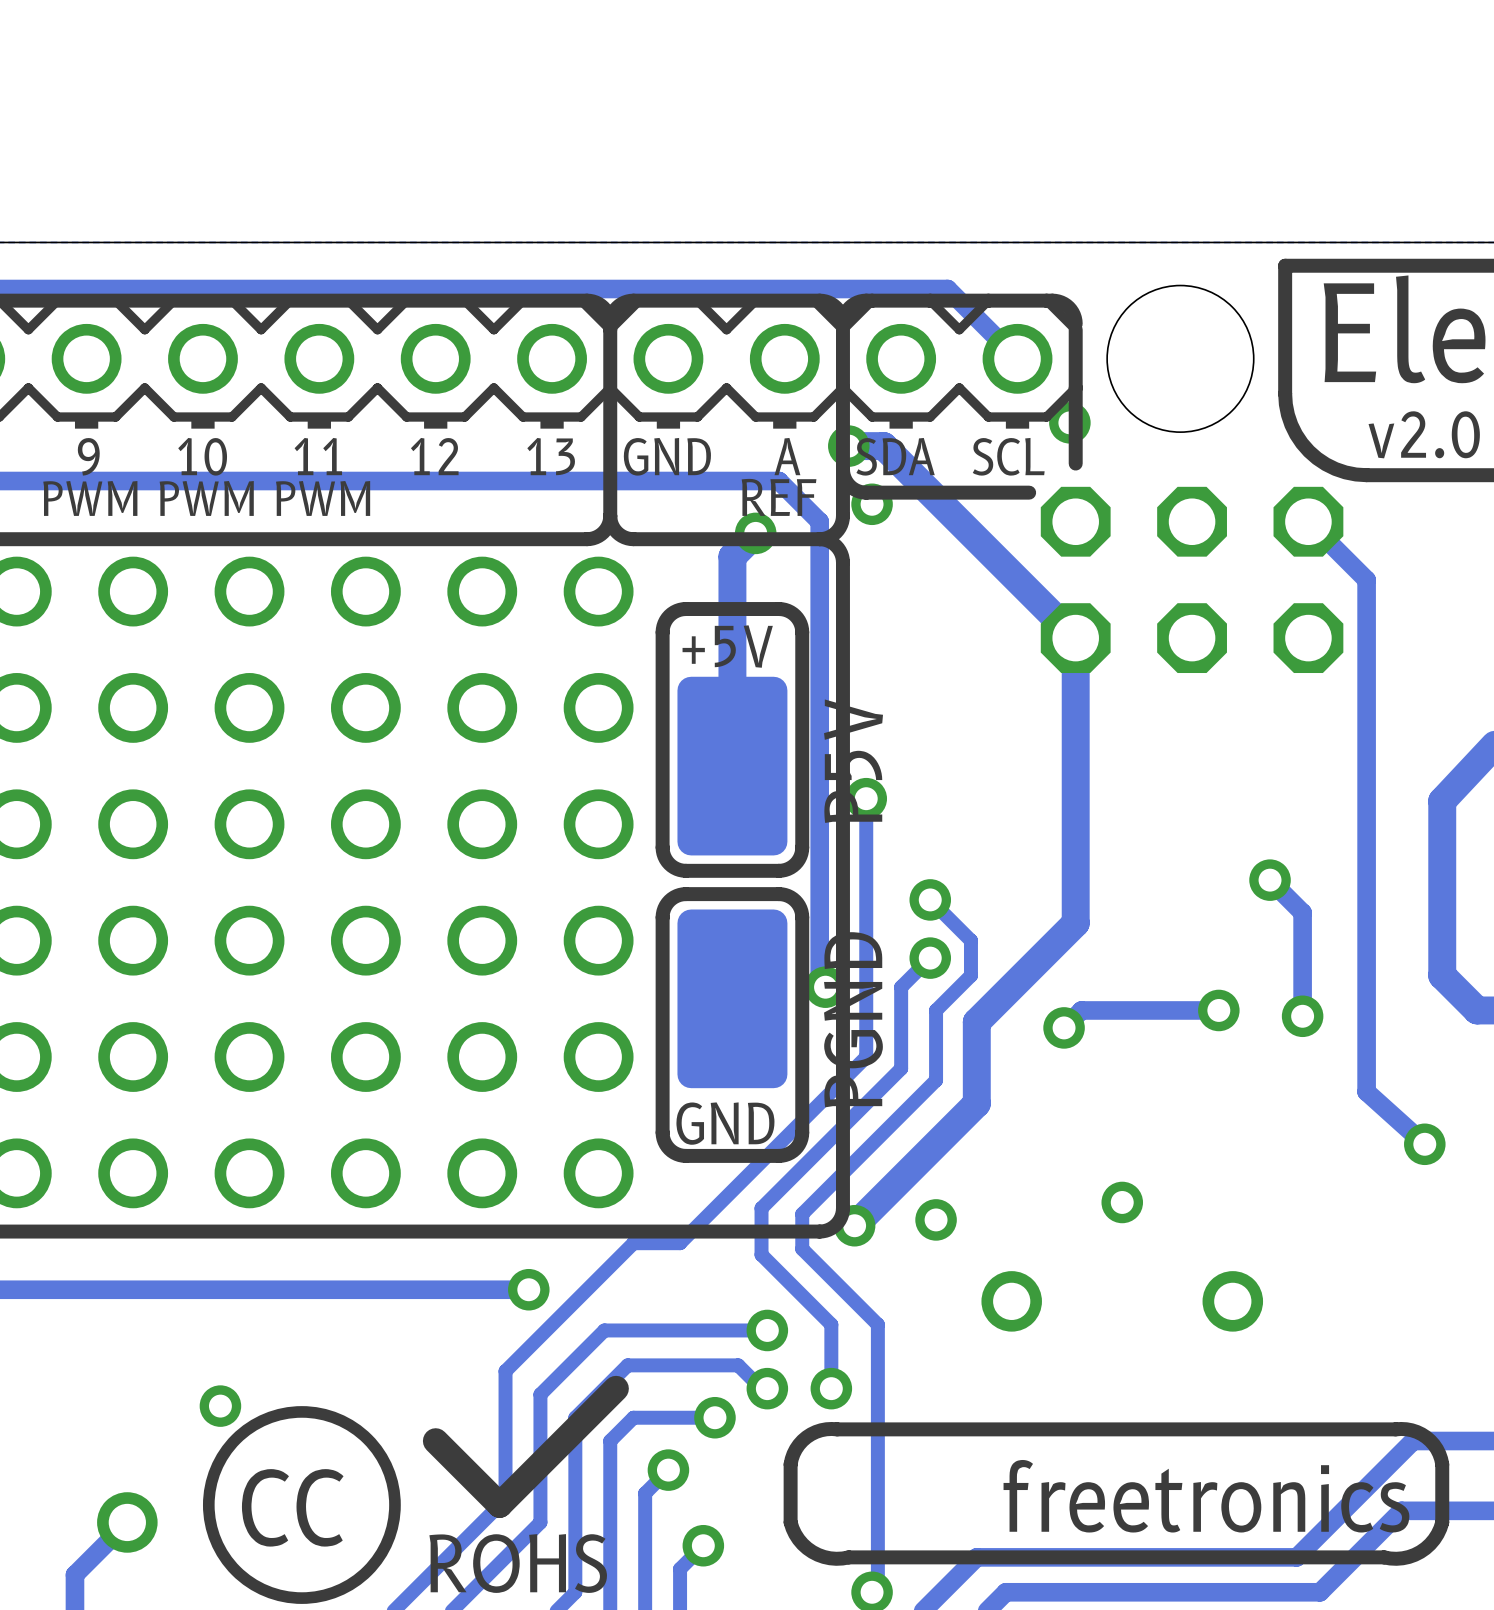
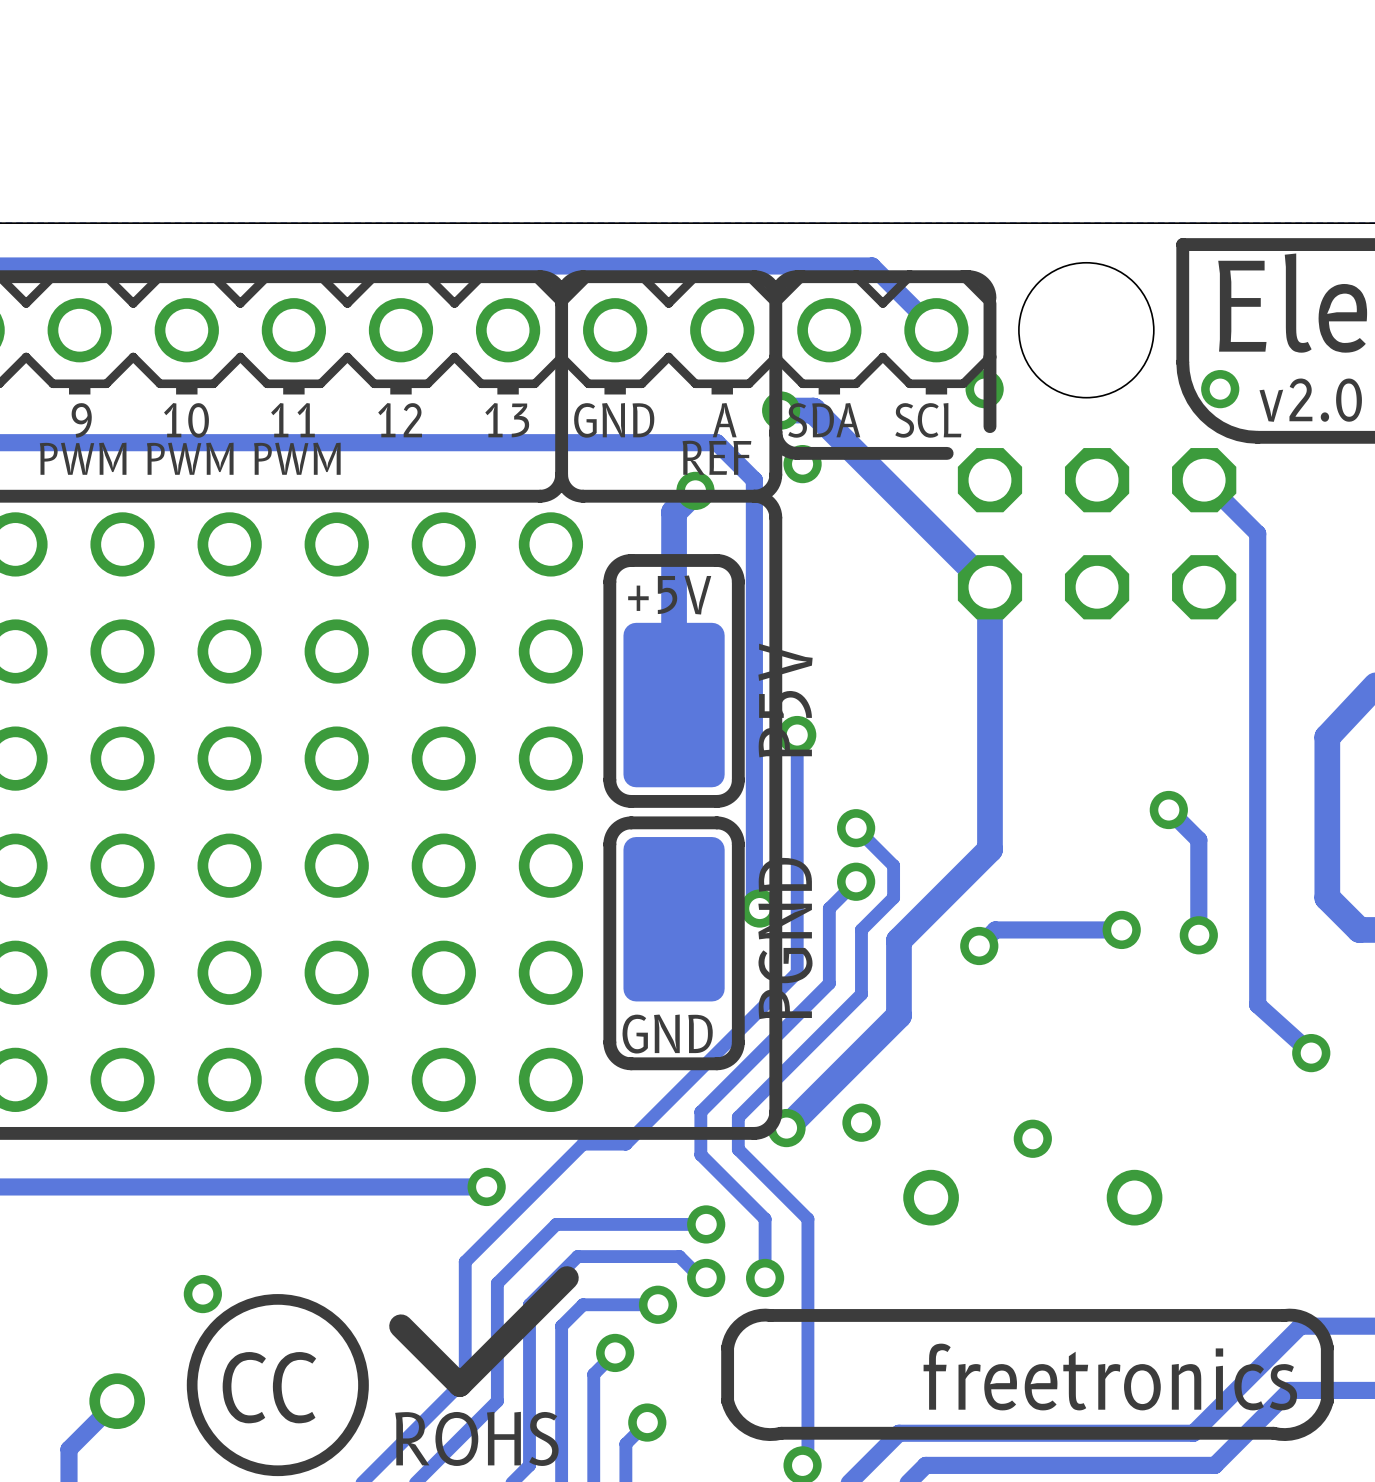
via: none -> (1220, 389)
via position: (1122, 1202) -> (1032, 1138)

